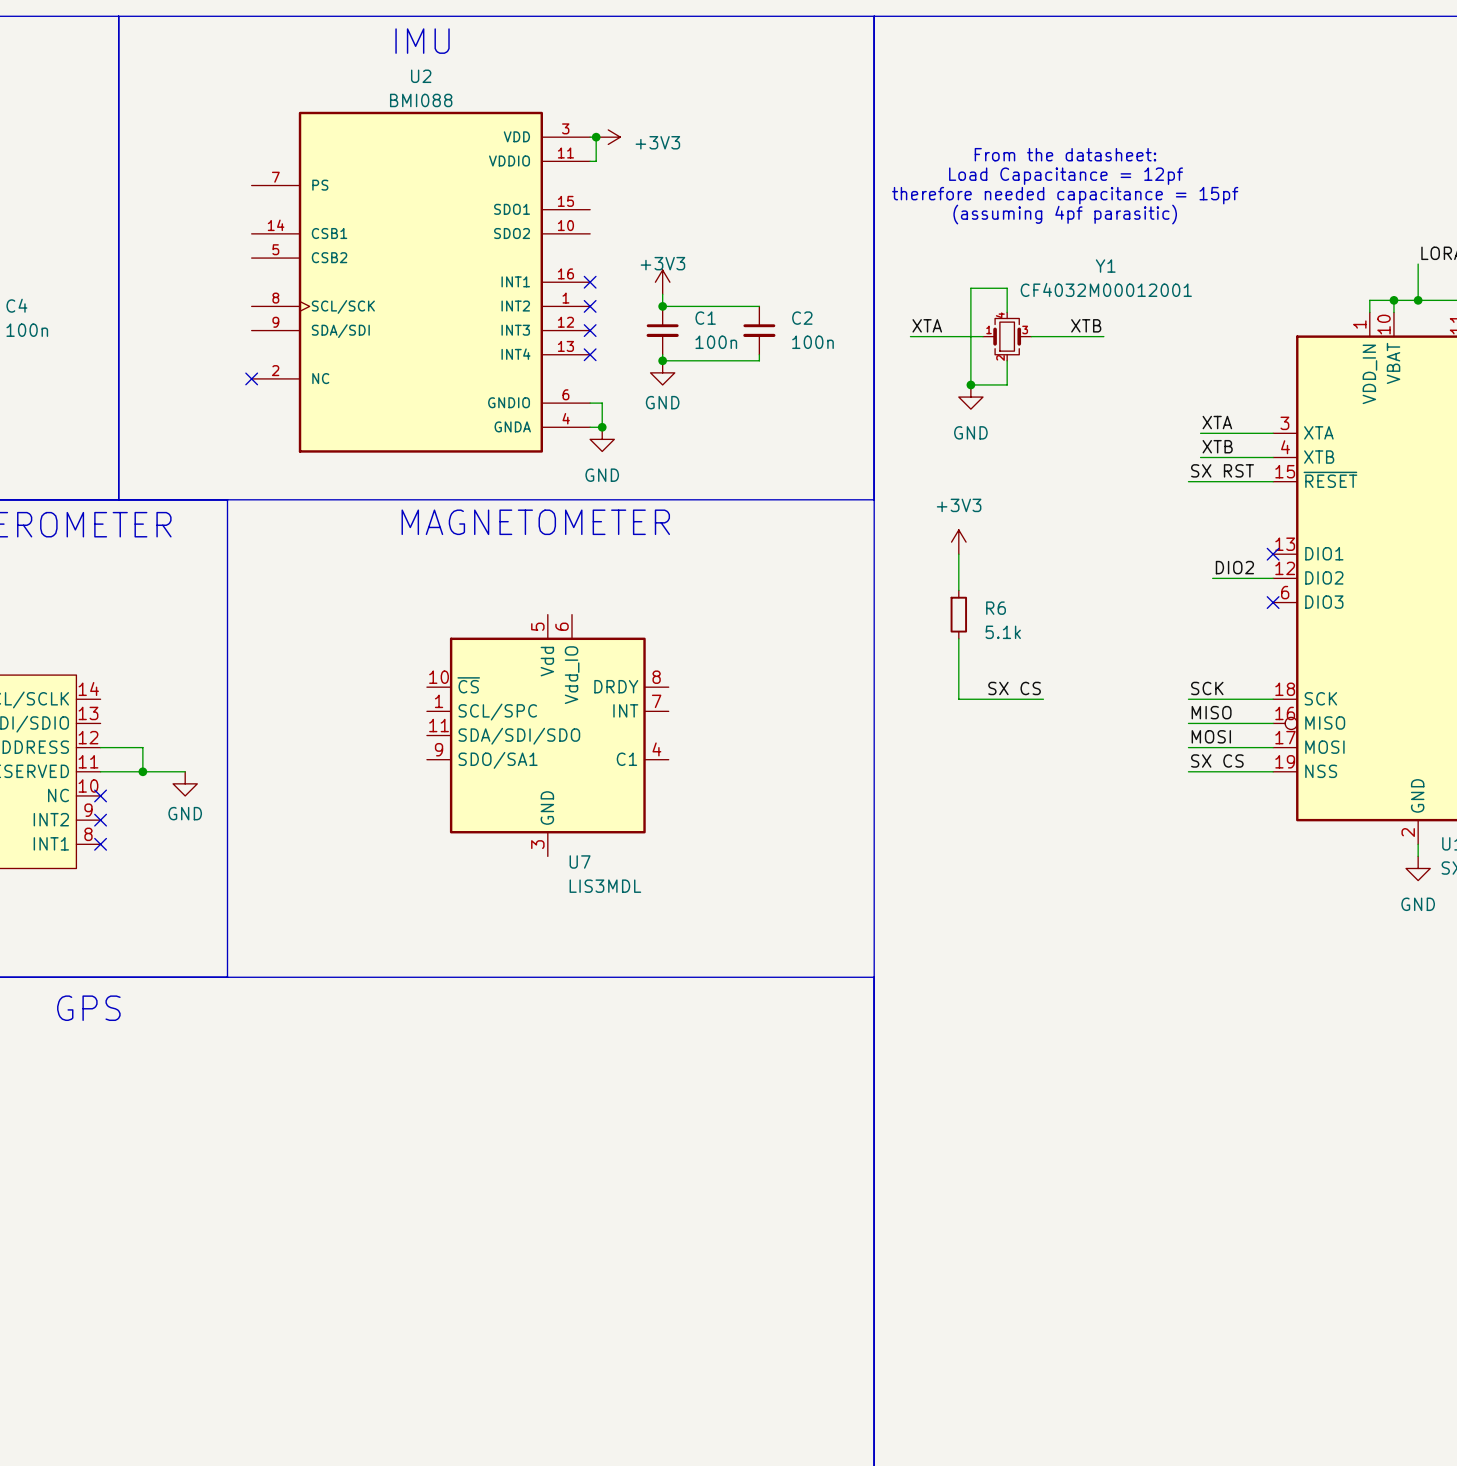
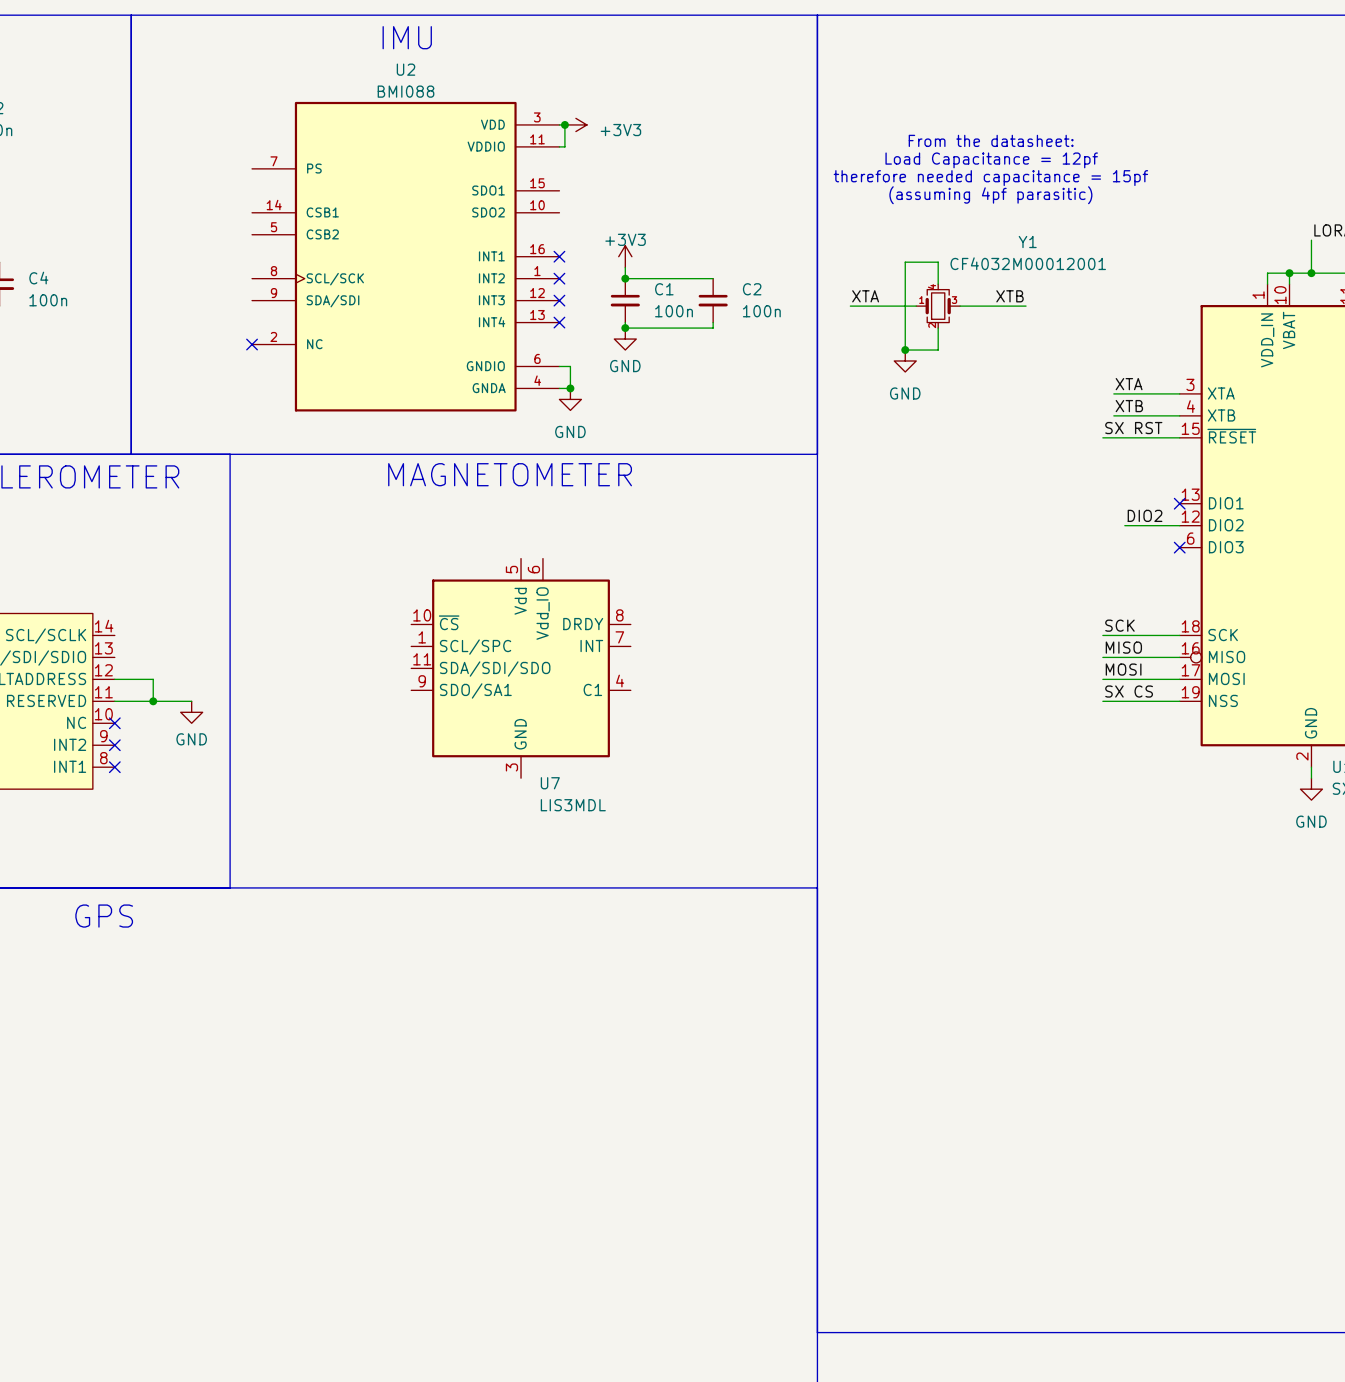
power symbol: +3V3 (958, 542) -> none
wire: (958, 554) (958, 590) -> none
R6: 5.1k (958, 614) -> none
wire: (958, 638) (958, 699) (1043, 699) -> none
label: SX CS (1014, 688) -> none

